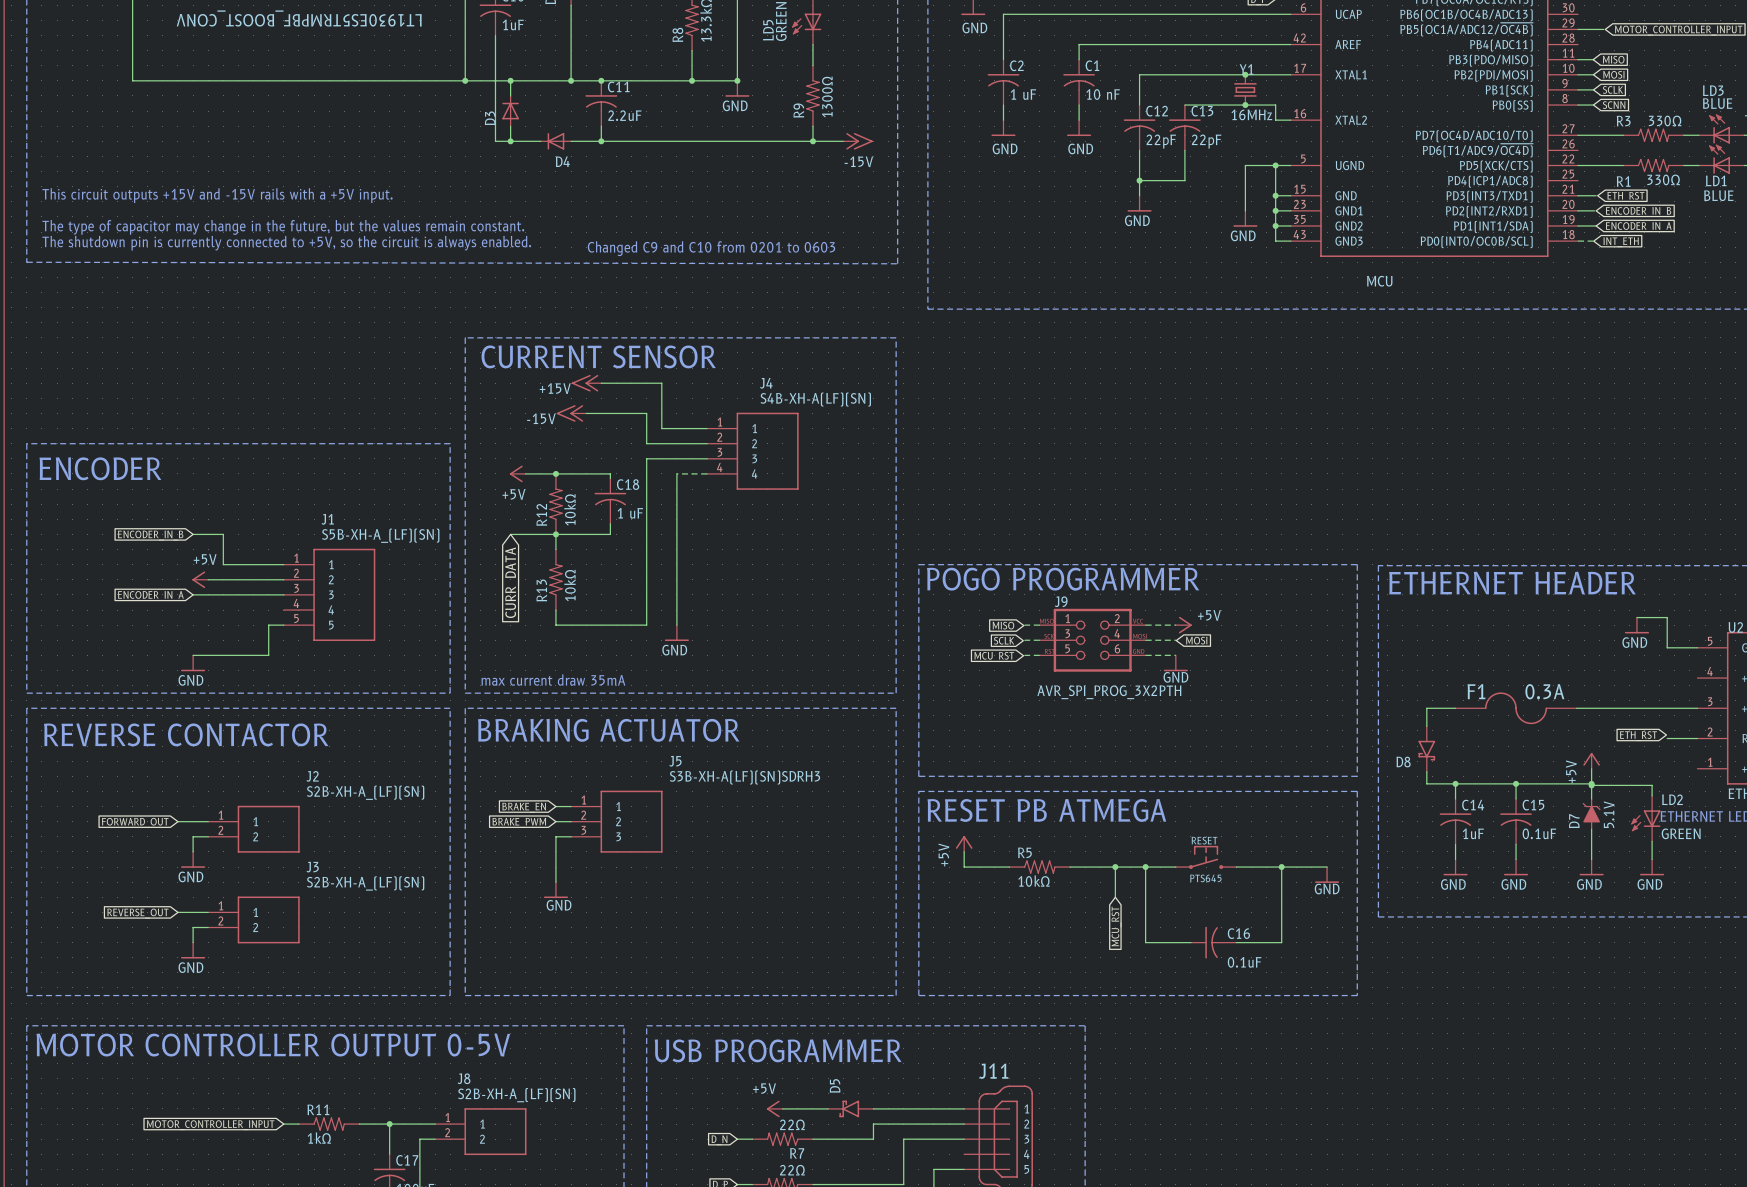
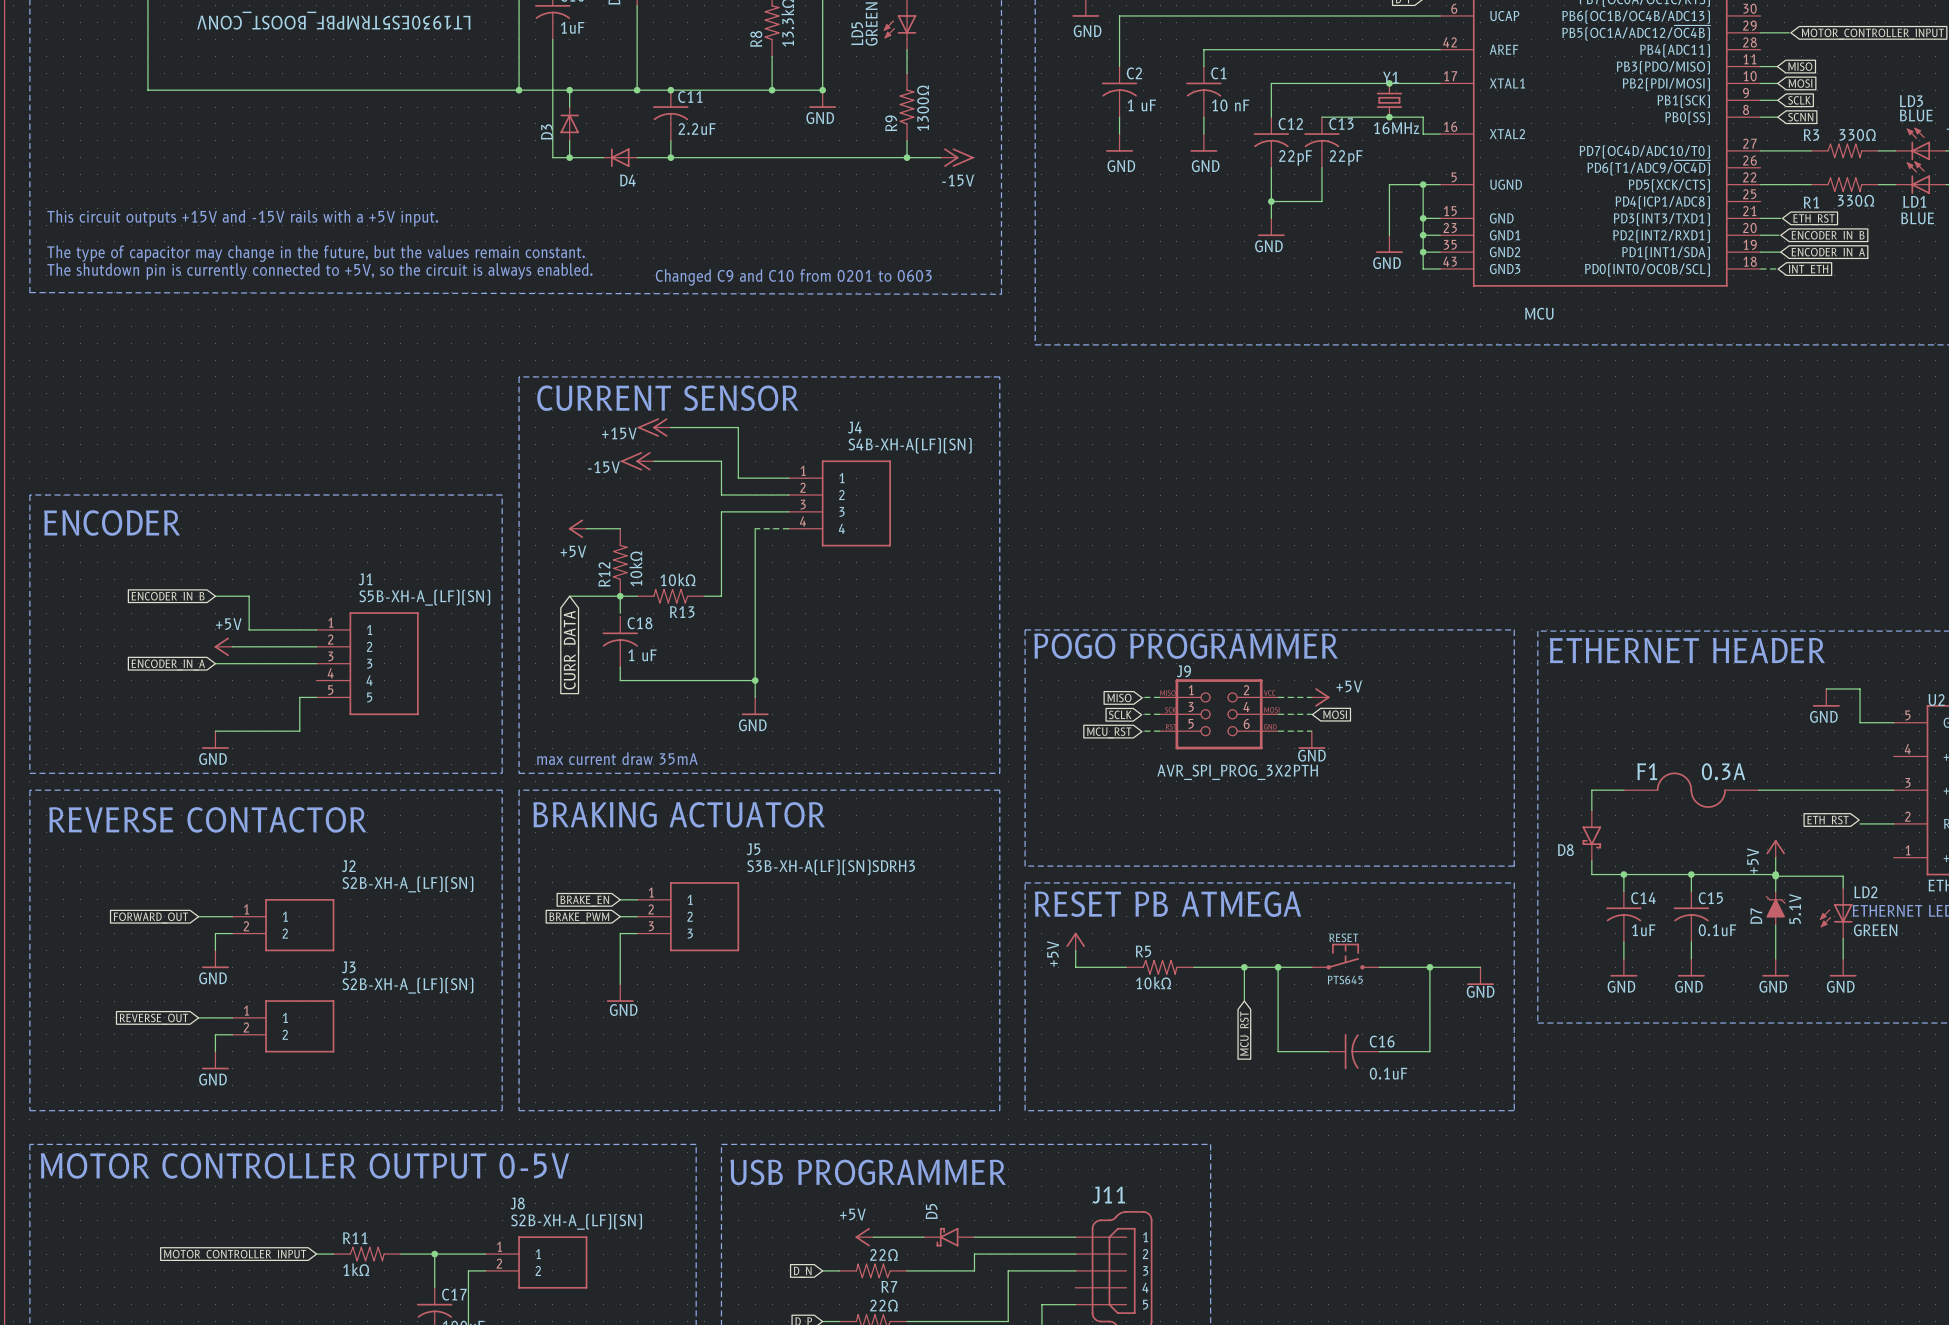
wire: (555, 473) (610, 473) (610, 478) -> none
junction: (555, 473) -> none
C18 position: (610, 501) -> (620, 641)
wire: (646, 534) (646, 625) (555, 625) (555, 610) -> (721, 596) (704, 596)
R13 rotation: 0° (555, 579) -> 90° counterclockwise (670, 596)
R13 position: (555, 579) -> (670, 596)
wire: none -> (620, 667) (620, 680) (755, 680)
junction: none -> (755, 680)

